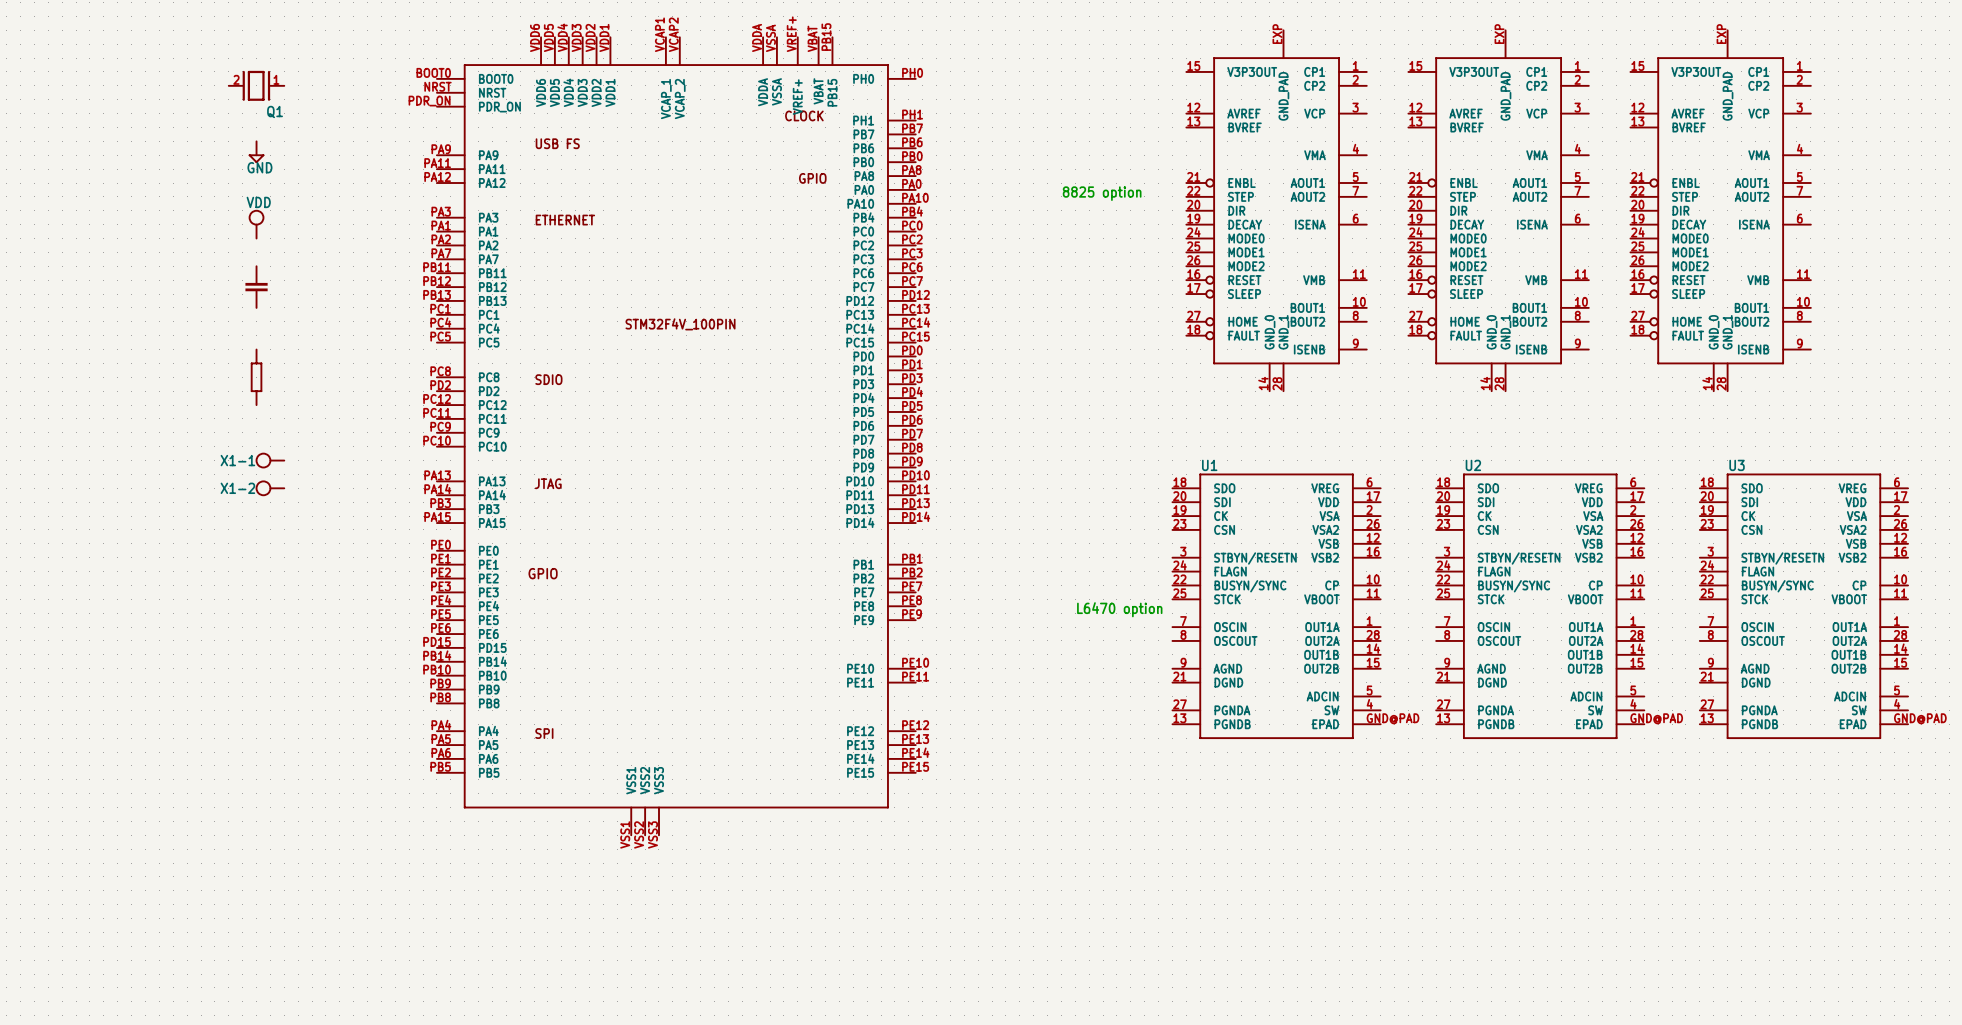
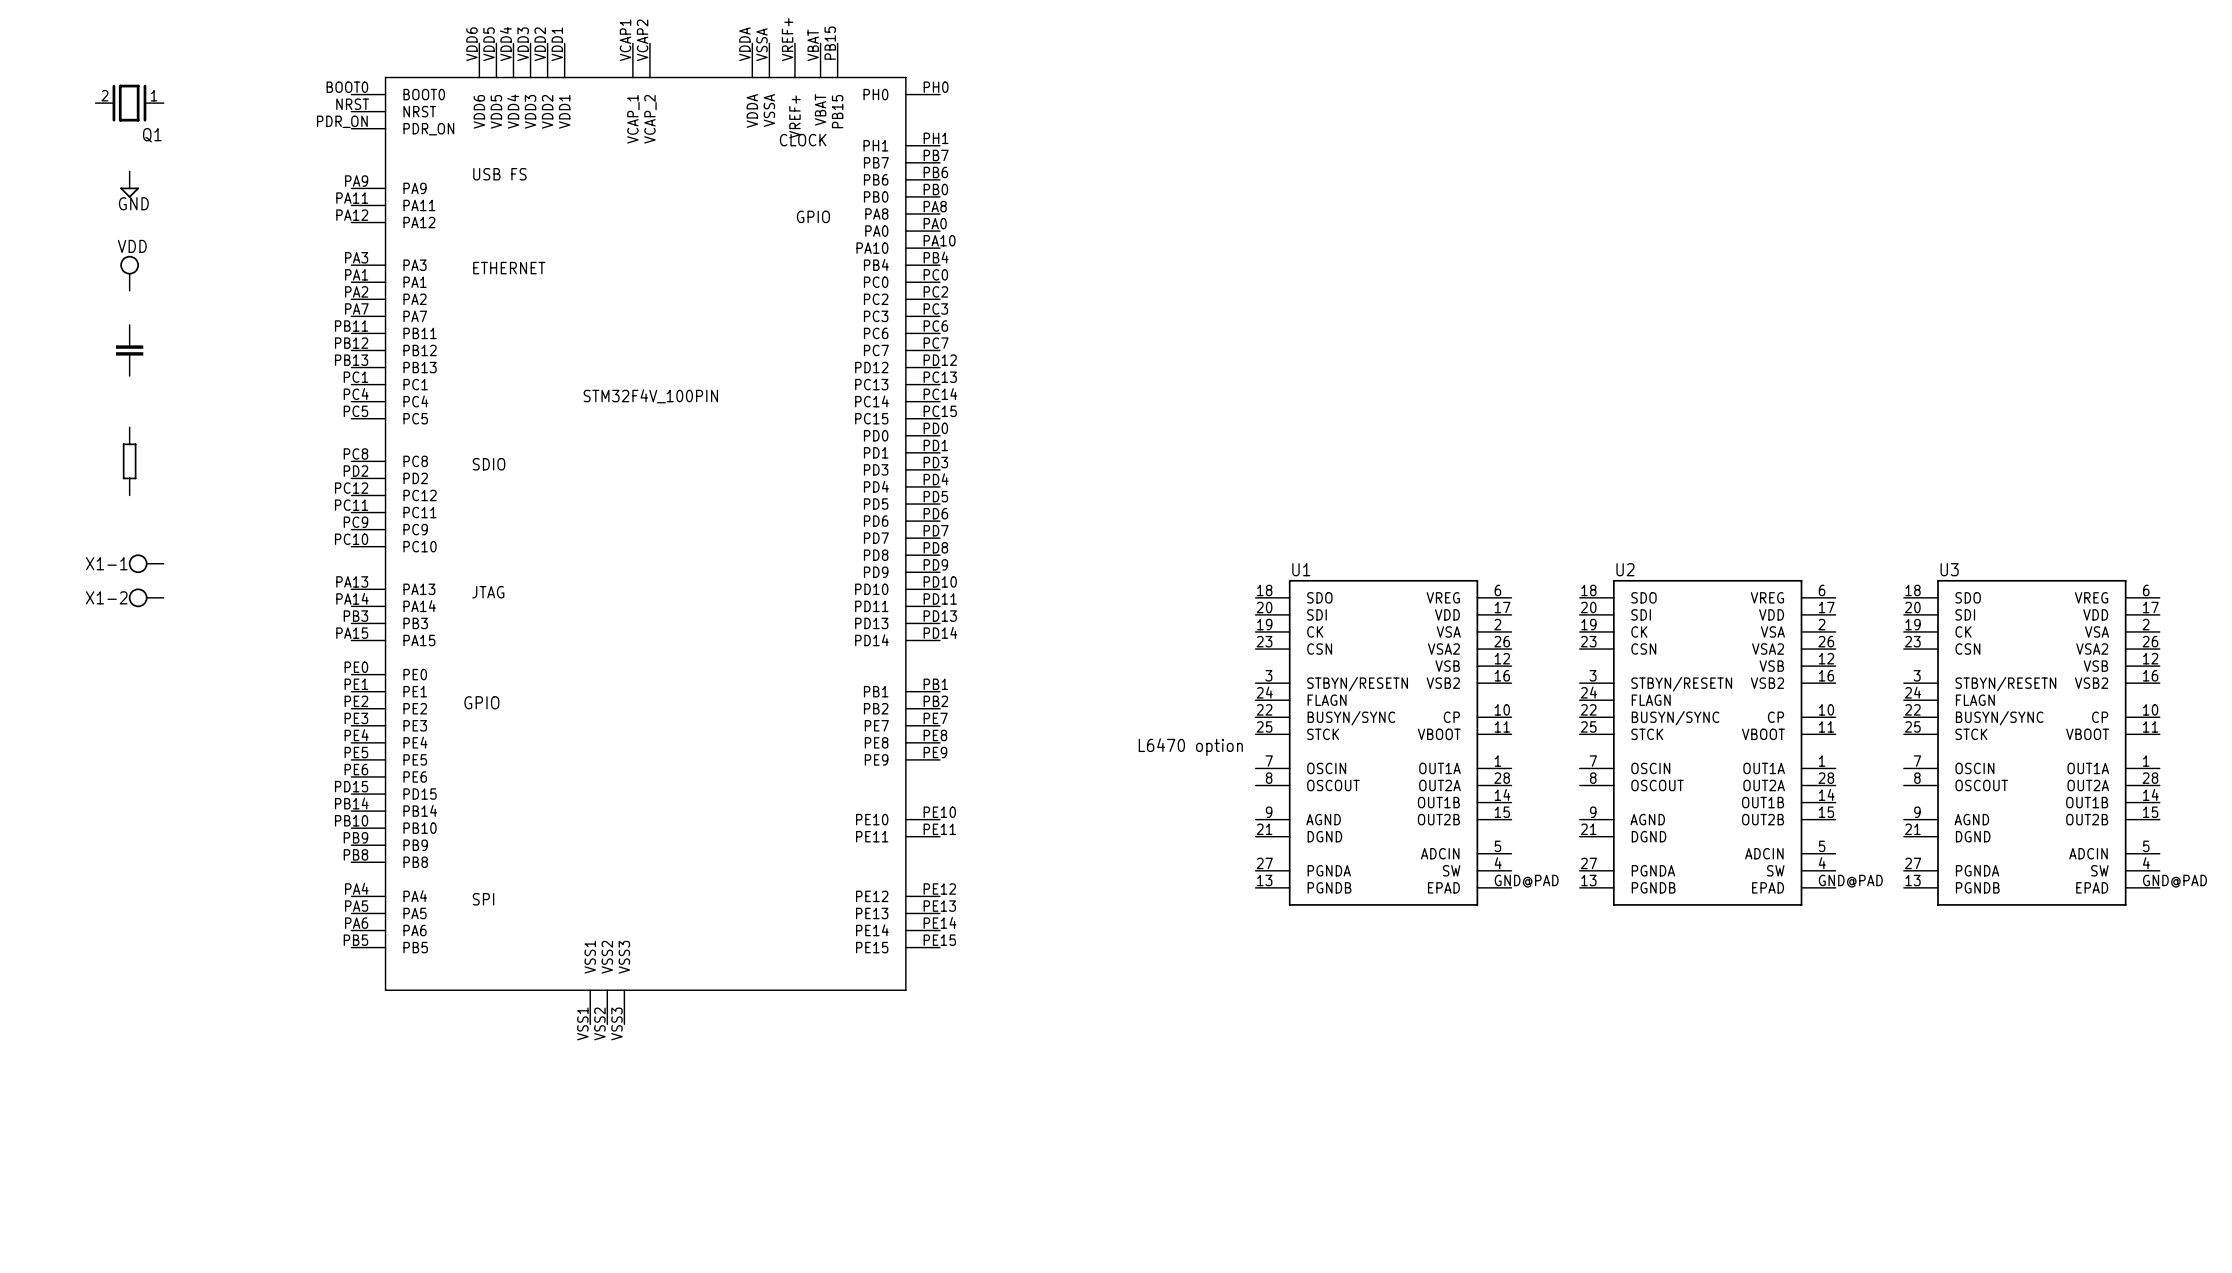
text: 8825 option (1102, 193) -> none
part: (1276, 210) -> none
part: (1498, 210) -> none
part: (1720, 210) -> none

